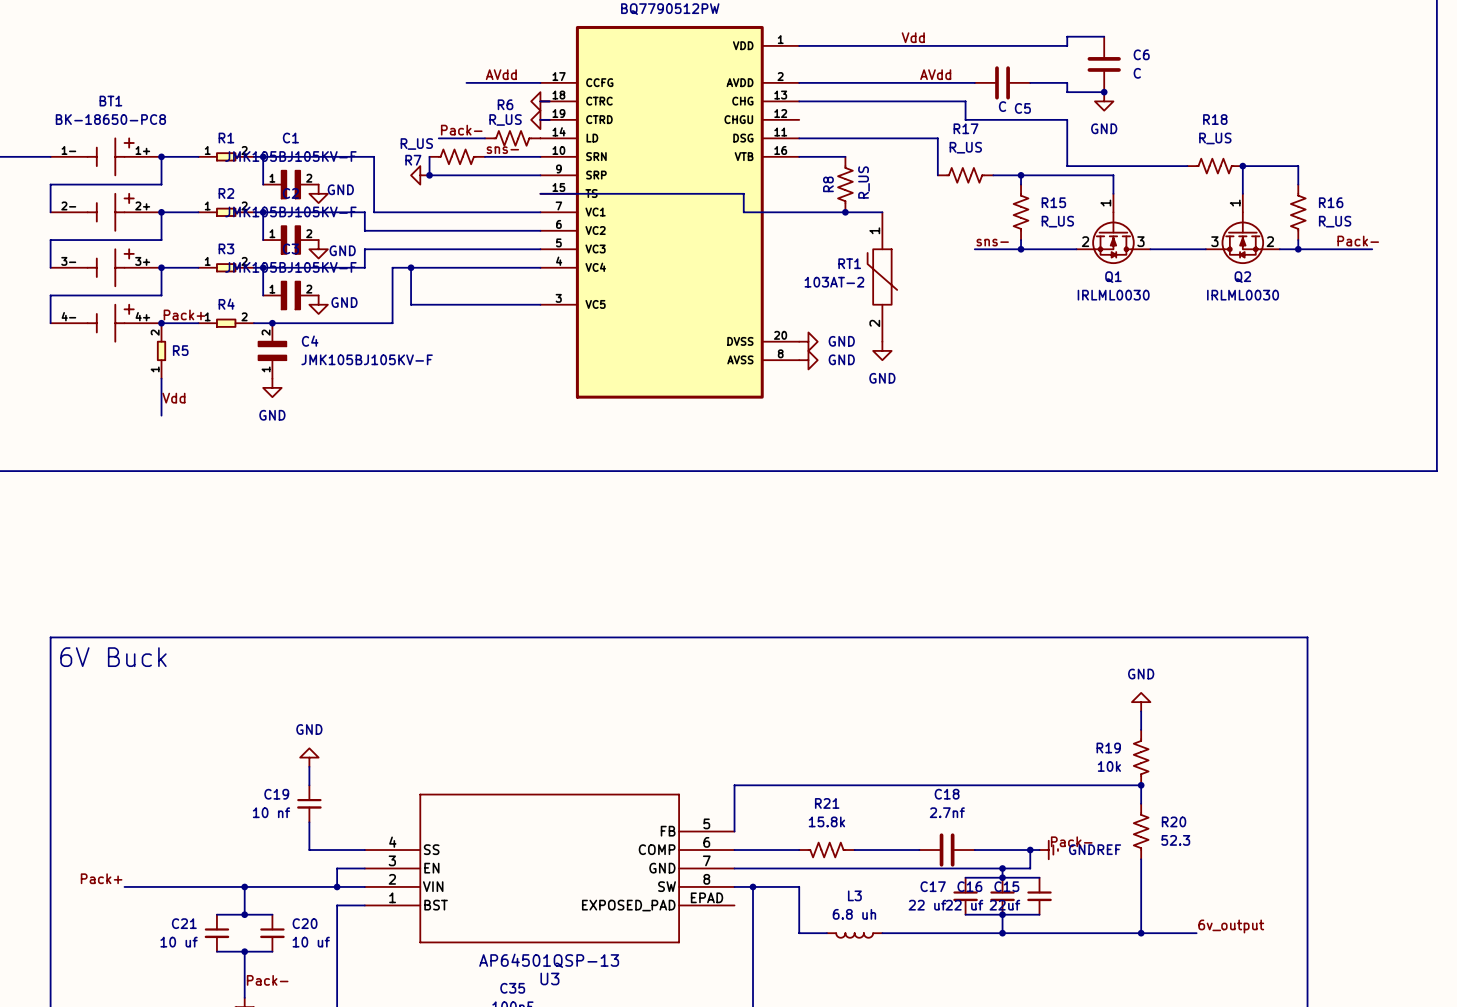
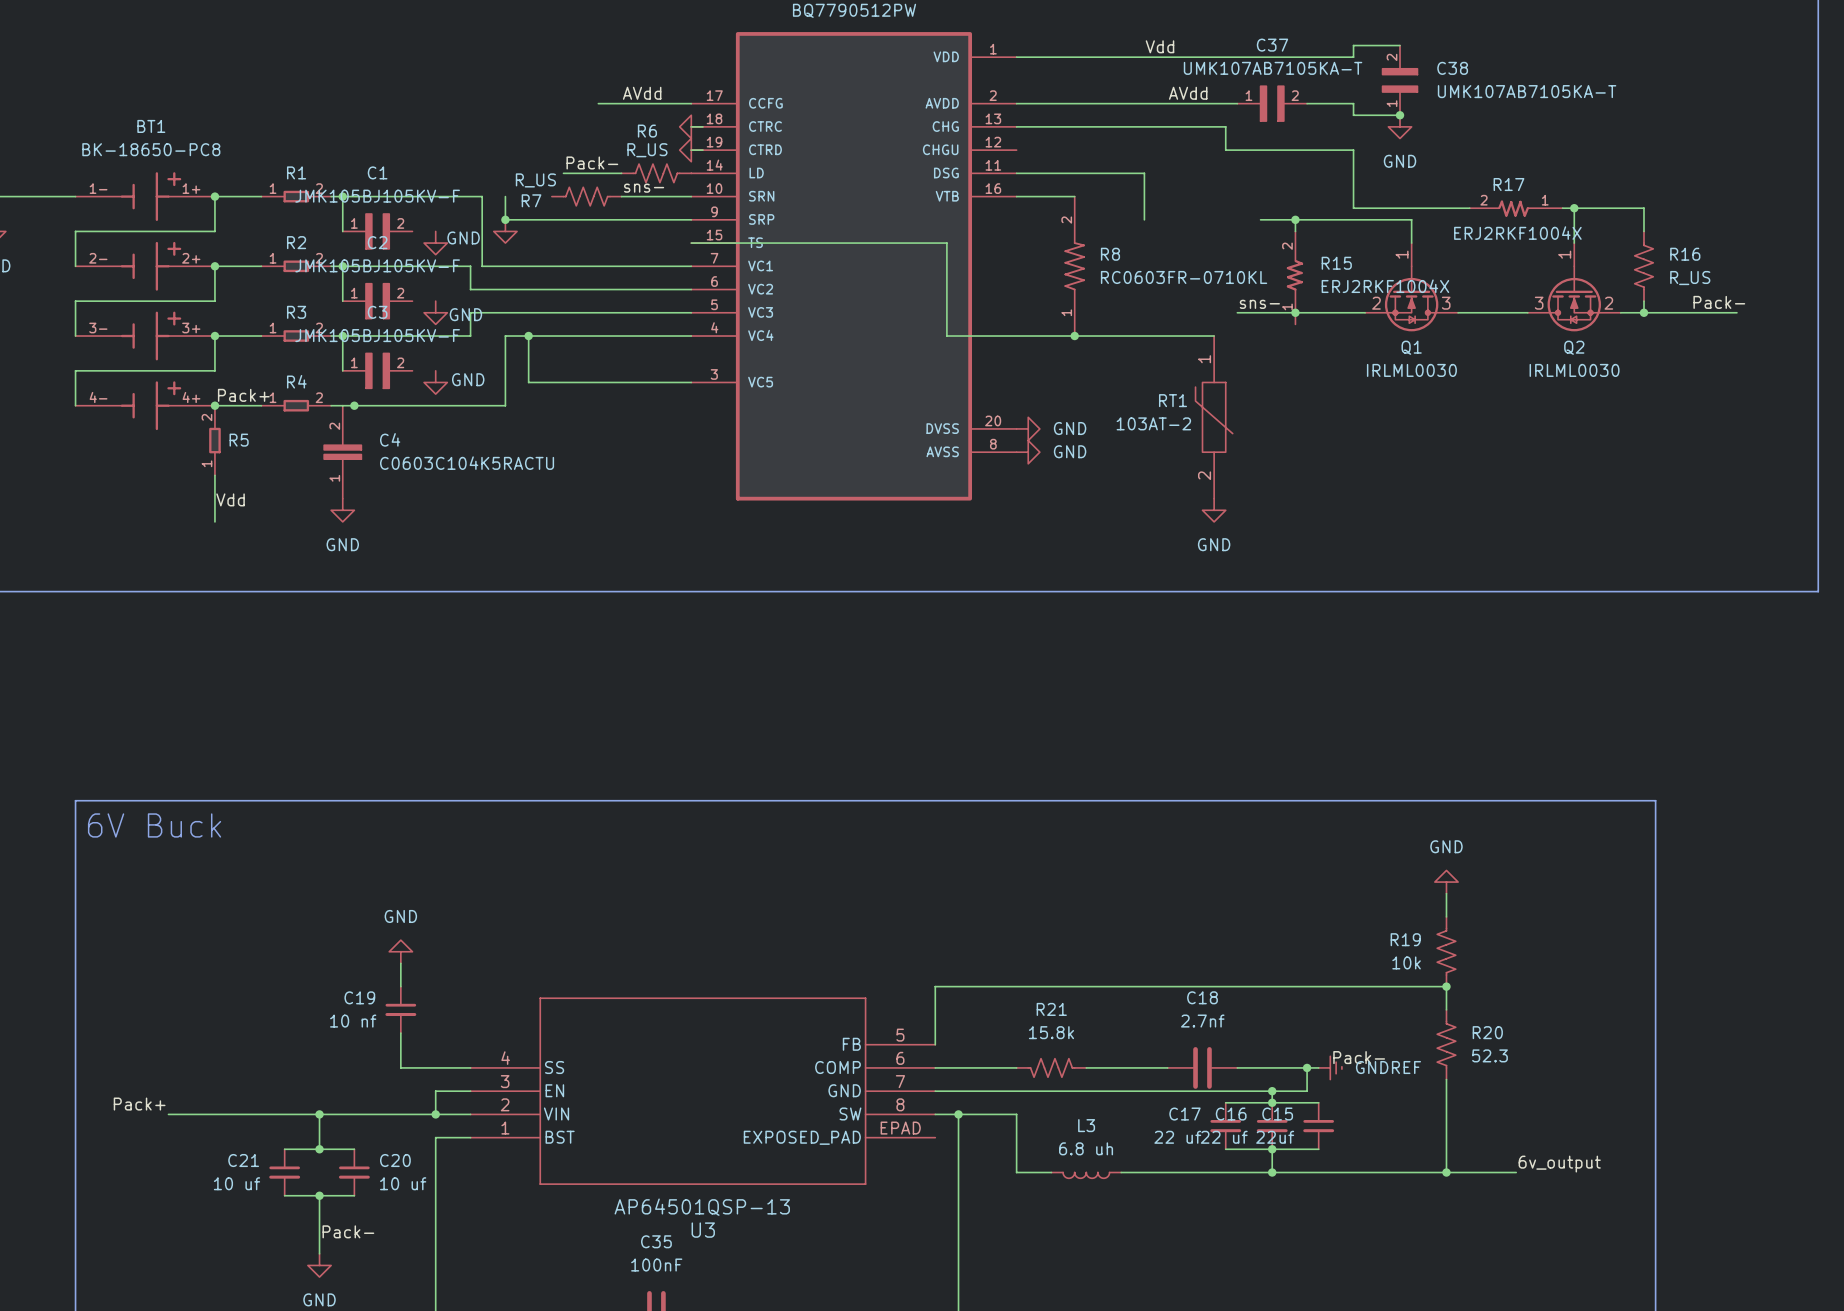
C6: C (1104, 64) -> none
C38: none -> UMK107AB7105KA-T (1400, 80)
C5: C (1002, 82) -> none
C37: none -> UMK107AB7105KA-T (1272, 103)
R17 name position: R17 (966, 128) -> R17 (1508, 184)
wire: (900, 138) (937, 138) (937, 175) -> (1144, 173) (1144, 219)
R17 value: R_US (965, 147) -> ERJ2RKF1004X (1517, 233)
wire: (429, 156) (429, 175) -> (505, 196) (505, 219) (551, 219)
R8 symbol: [838, 156, 853, 213] -> [1064, 196, 1085, 337]
R18: R_US (1215, 166) -> none
R17 symbol: [937, 167, 994, 183] -> [1469, 200, 1563, 217]
power symbol rotation: 0° (420, 175) -> 90° counterclockwise (505, 231)
power symbol position: (420, 175) -> (505, 231)
junction position: (429, 175) -> (505, 219)
R8 value: R_US (864, 182) -> RC0603FR-0710KL (1184, 277)
R8 name position: R8 (828, 184) -> R8 (1110, 254)
R15 symbol: [1013, 184, 1029, 241] -> [1286, 231, 1304, 325]
power symbol position: GND (318, 193) -> GND (435, 243)
wire: (743, 212) (882, 212) -> (946, 266) (946, 336) (1214, 336)
junction: (845, 212) -> none
R15 value: R_US (1057, 221) -> ERJ2RKF1004X (1385, 286)
power symbol position: GND (318, 249) -> GND (435, 312)
junction: none -> (1074, 336)
RT1 position: (882, 277) -> (1214, 417)
power symbol position: GND (318, 304) -> GND (435, 382)
C4 symbol: [258, 323, 287, 379] -> [323, 405, 362, 499]
power symbol position: GND (882, 350) -> GND (1214, 510)
C4 value: JMK105BJ105KV-F (367, 359) -> C0603C104K5RACTU (467, 463)
power symbol position: GND (272, 387) -> GND (342, 510)

